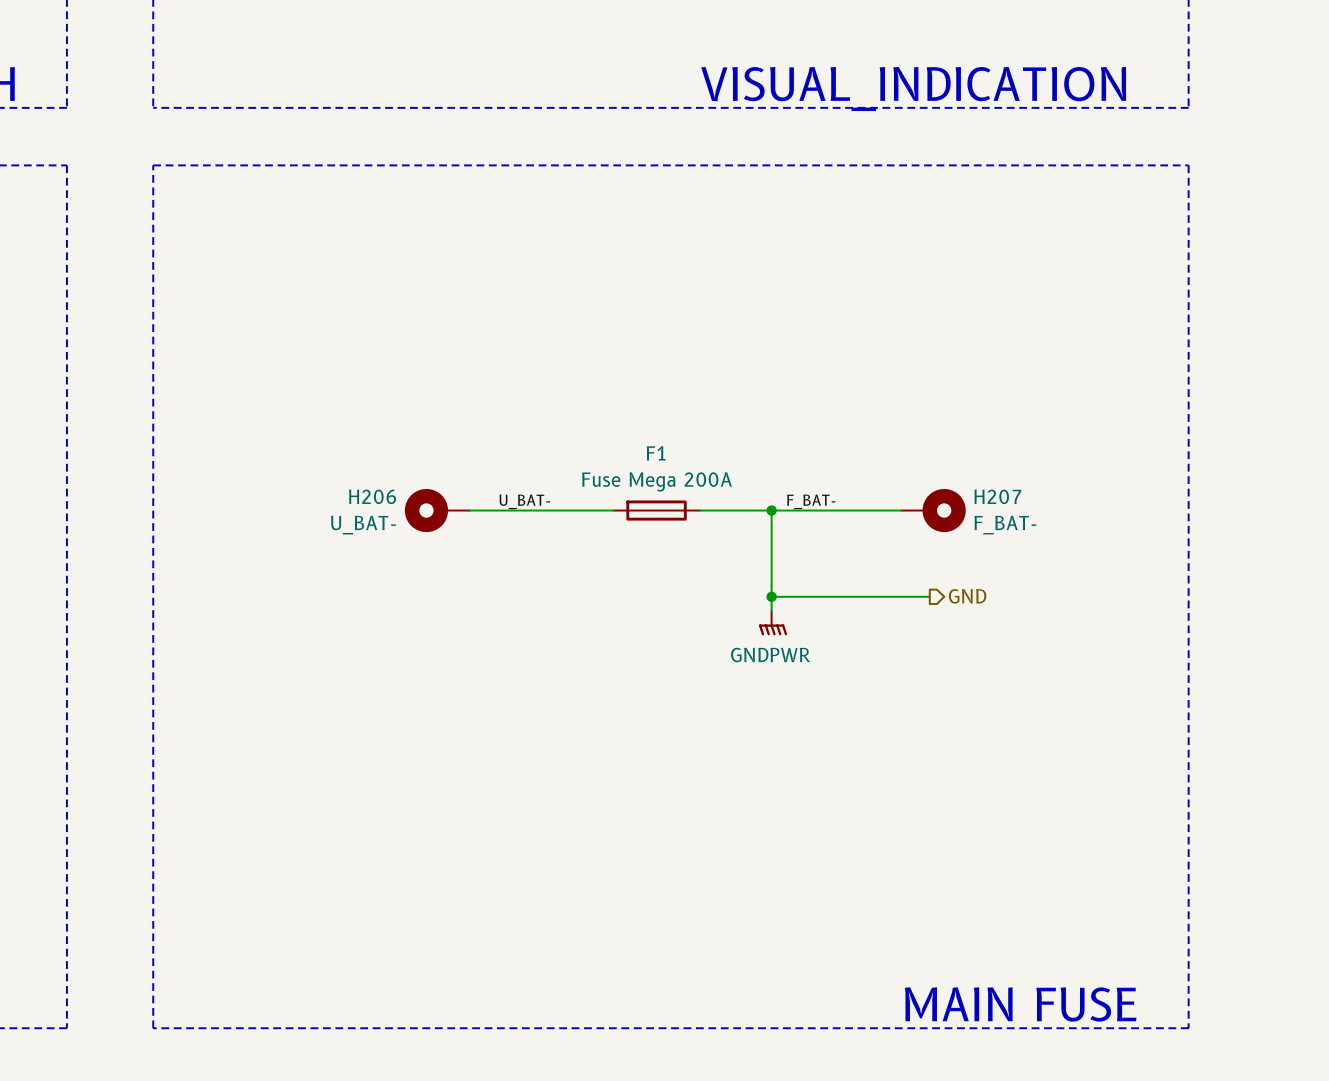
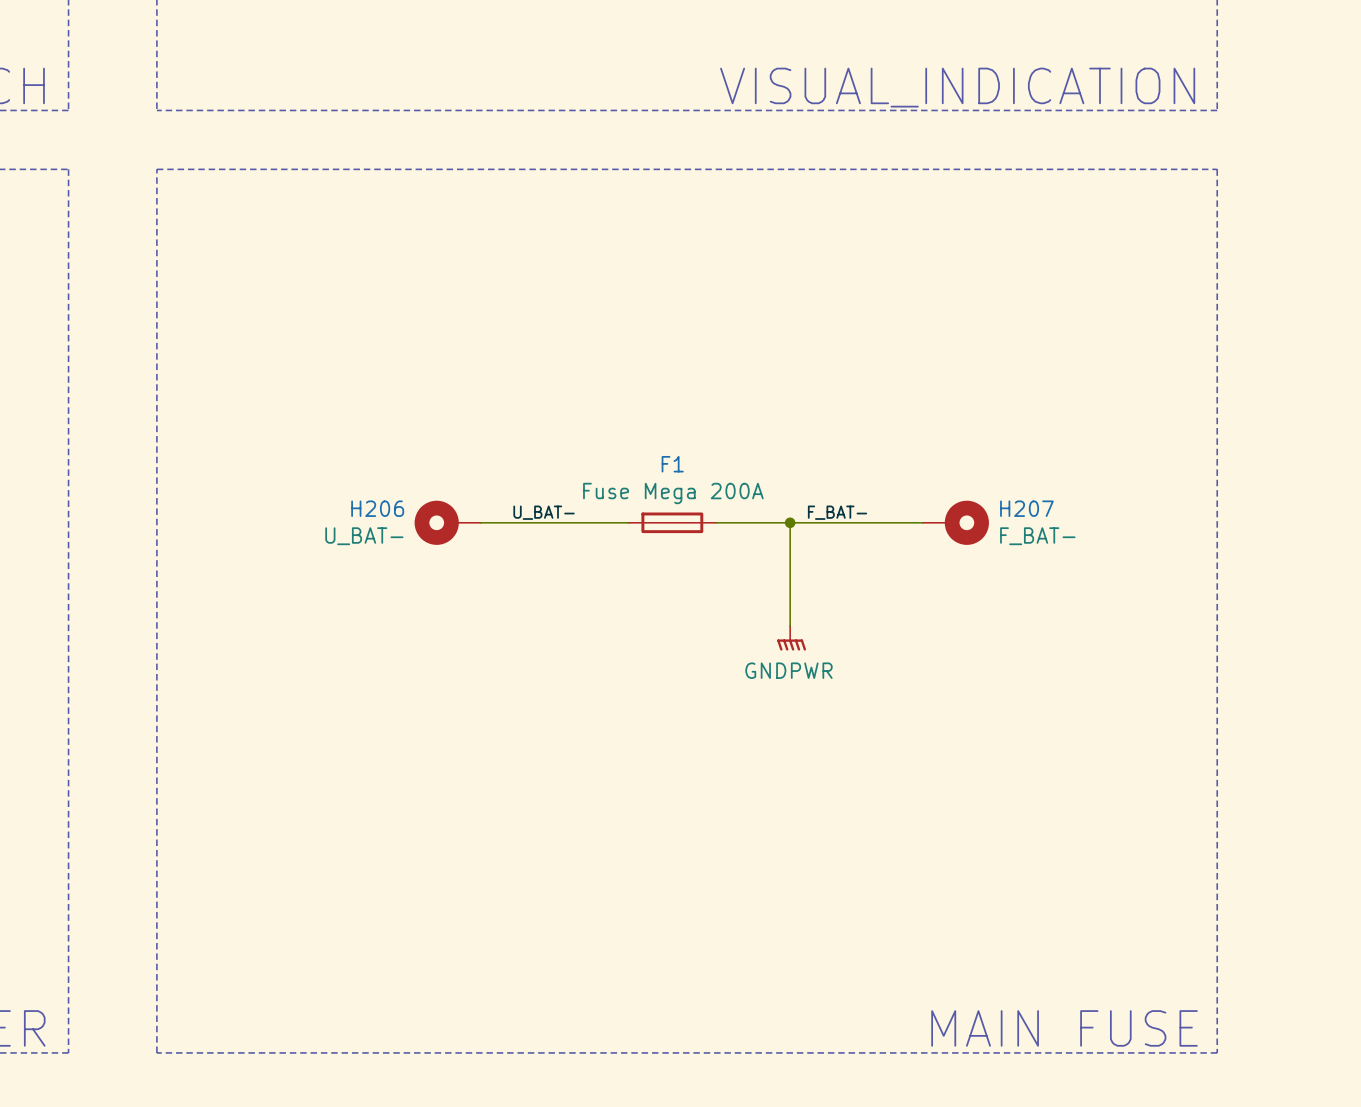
wire: (771, 596) (929, 596) -> none
junction: (771, 596) -> none
hierarchical label: GND (967, 596) -> none

